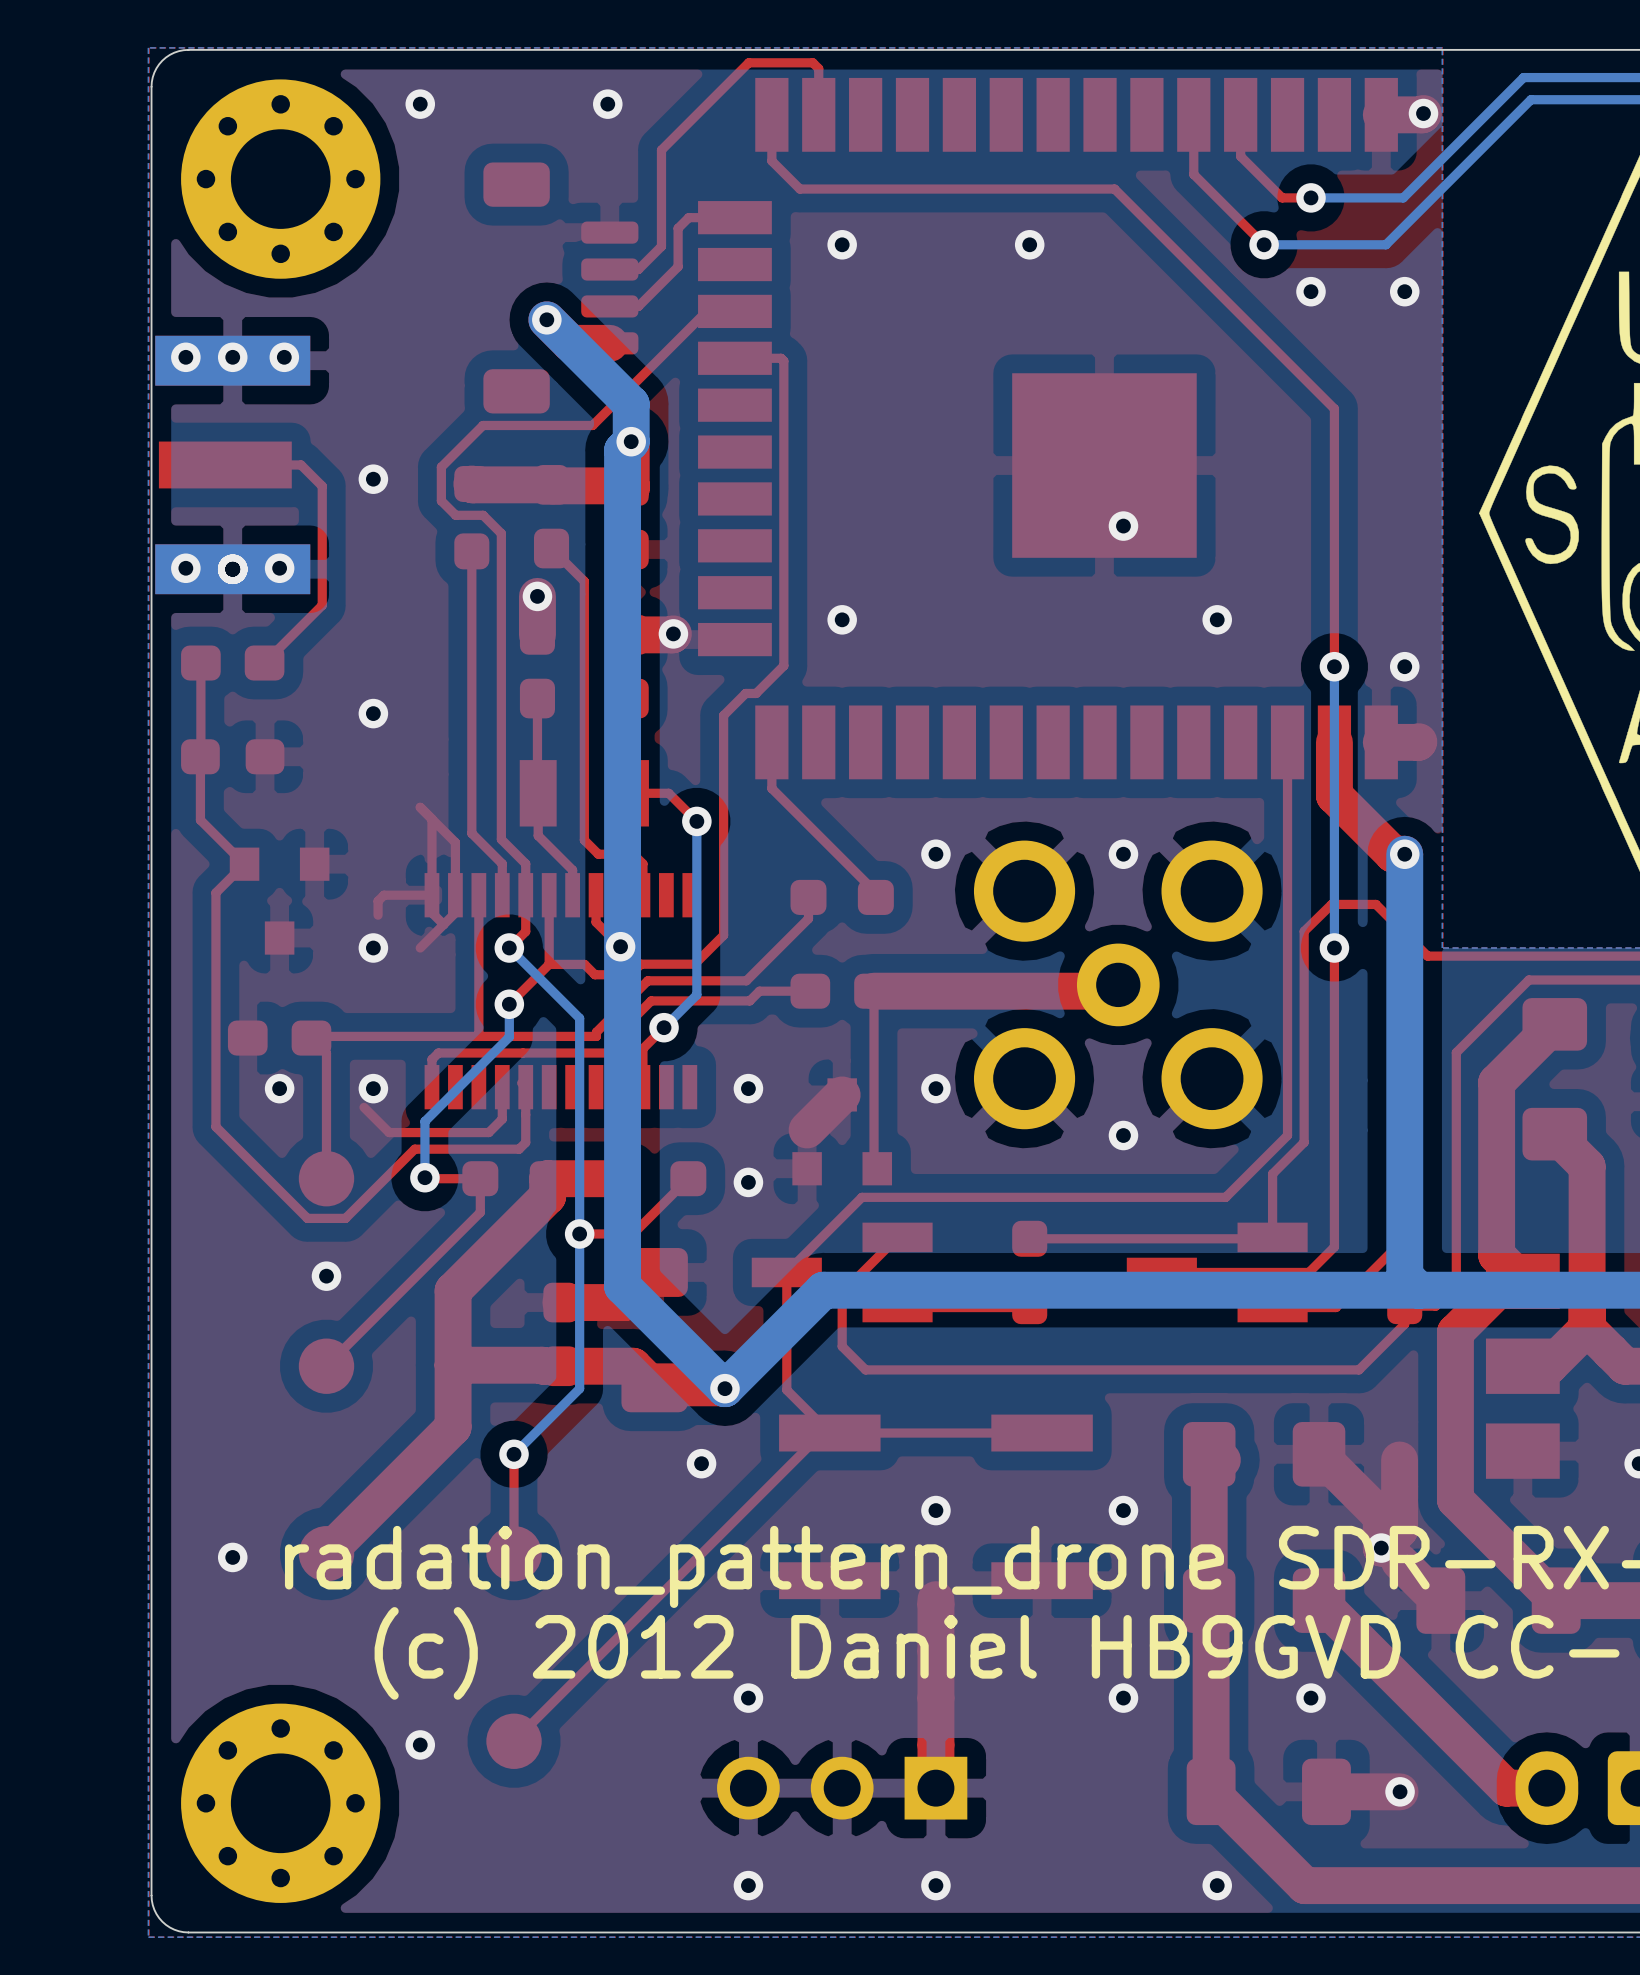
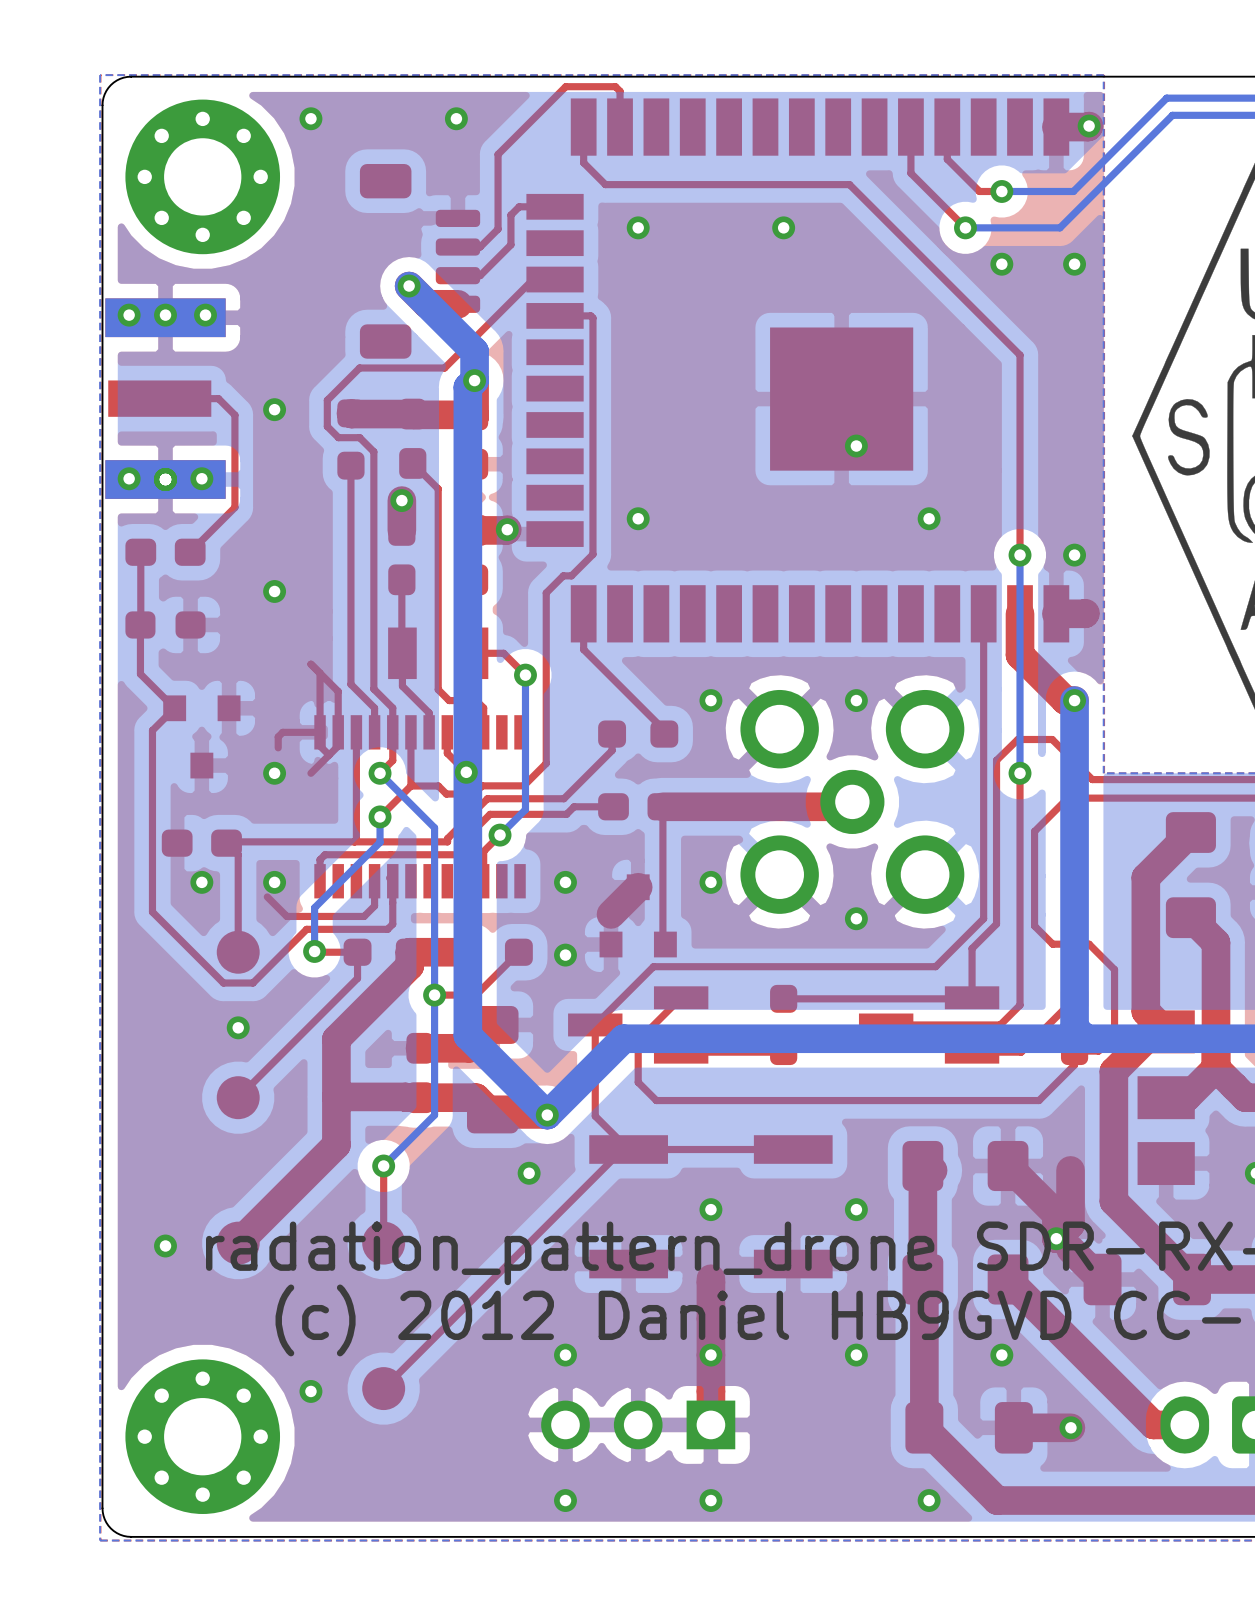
top track: (1528, 980) (1456, 1052) (1456, 1201) -> (1170, 798) (1067, 798) (1034, 831) (1034, 926) (1052, 944) (1089, 944) (1114, 969)
via: none -> (710, 1355)

